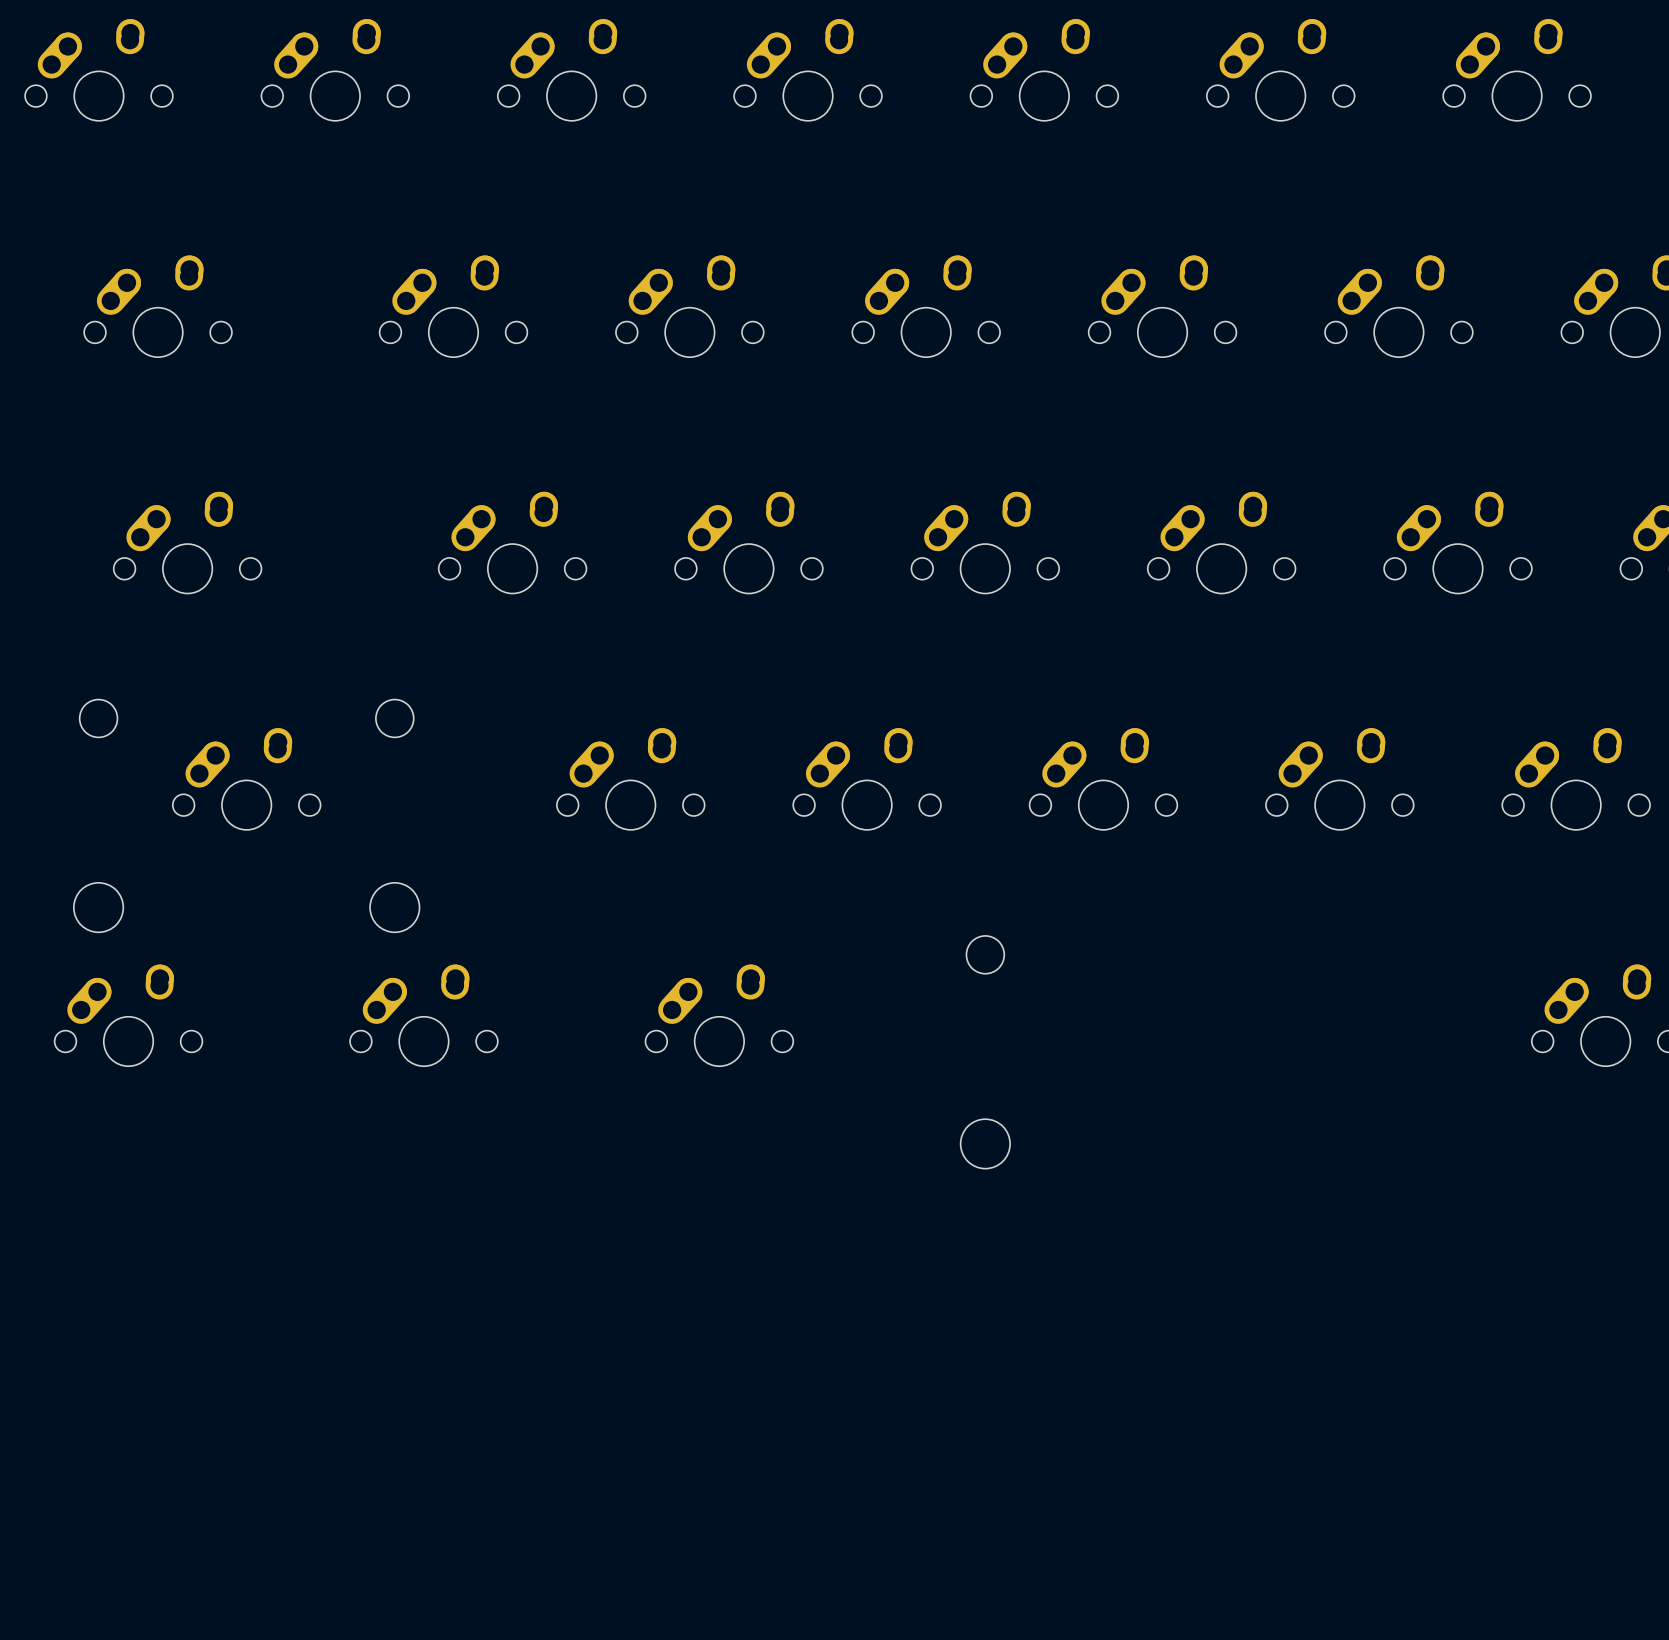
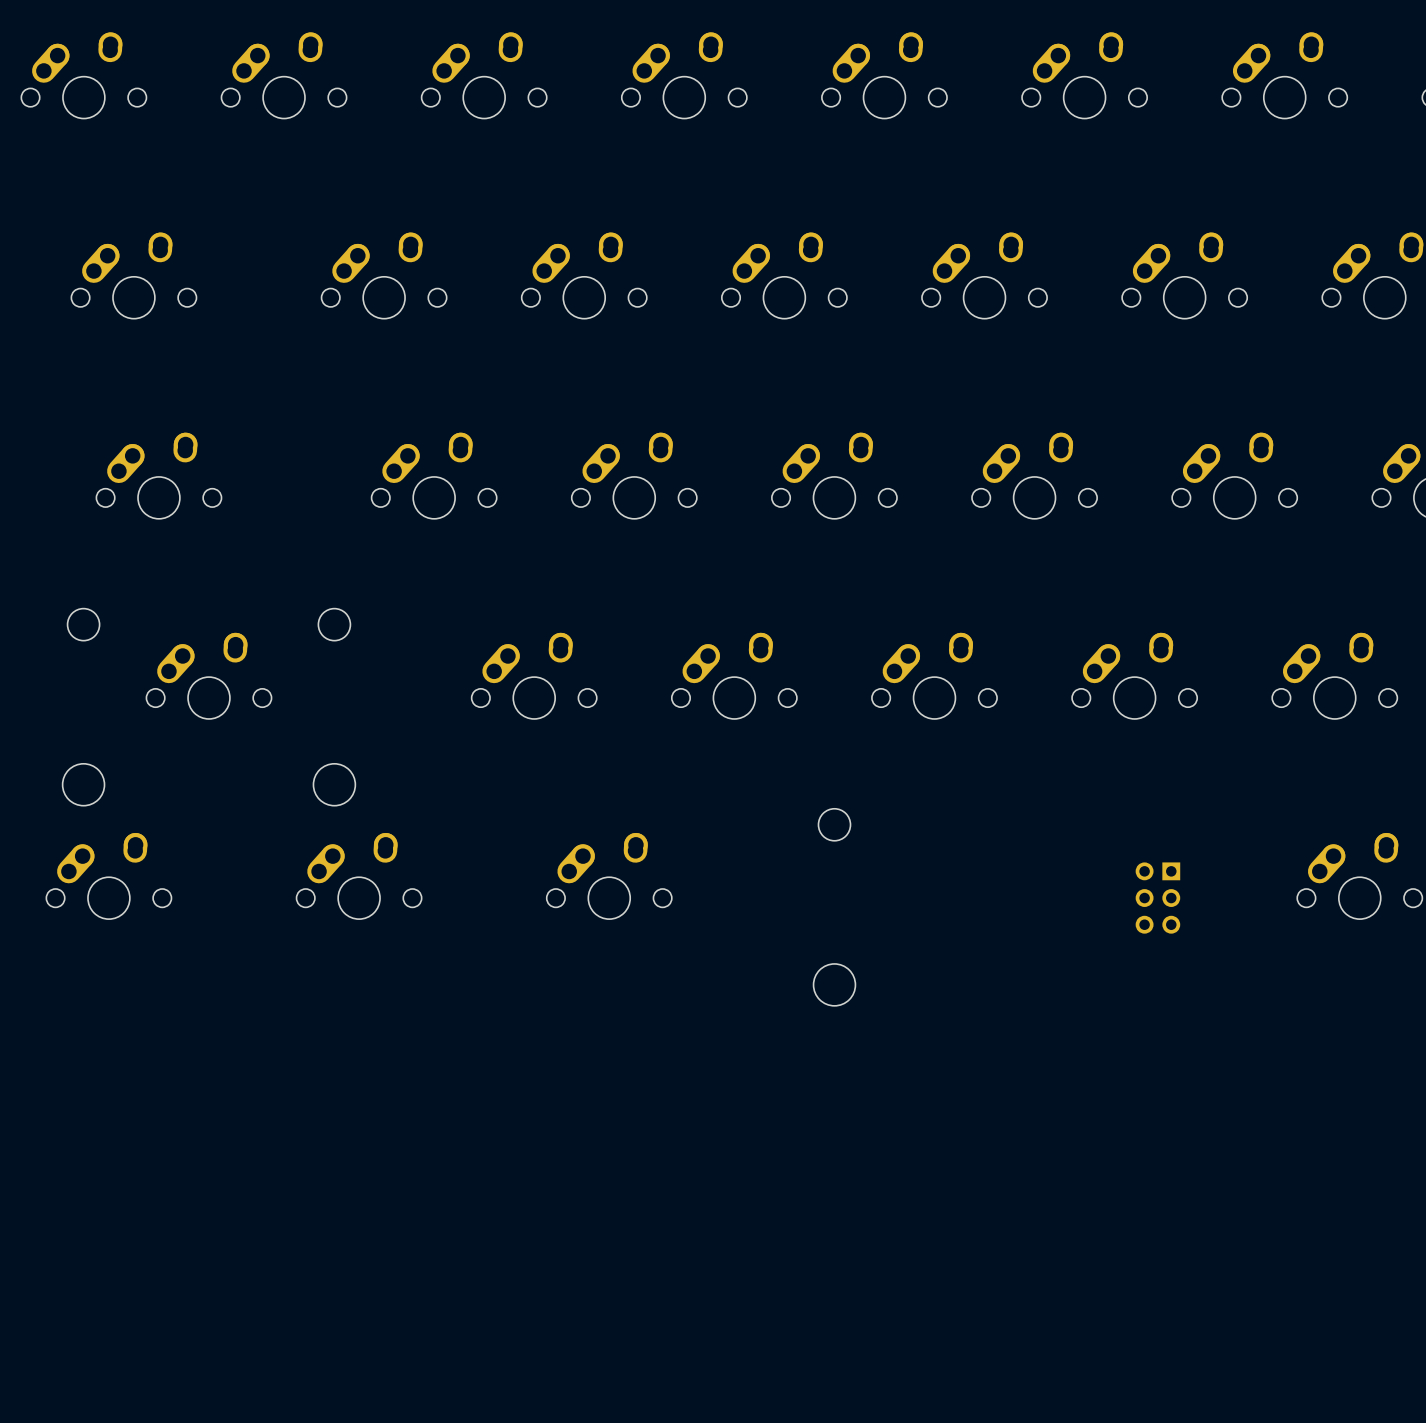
part: none -> (1157, 898)

